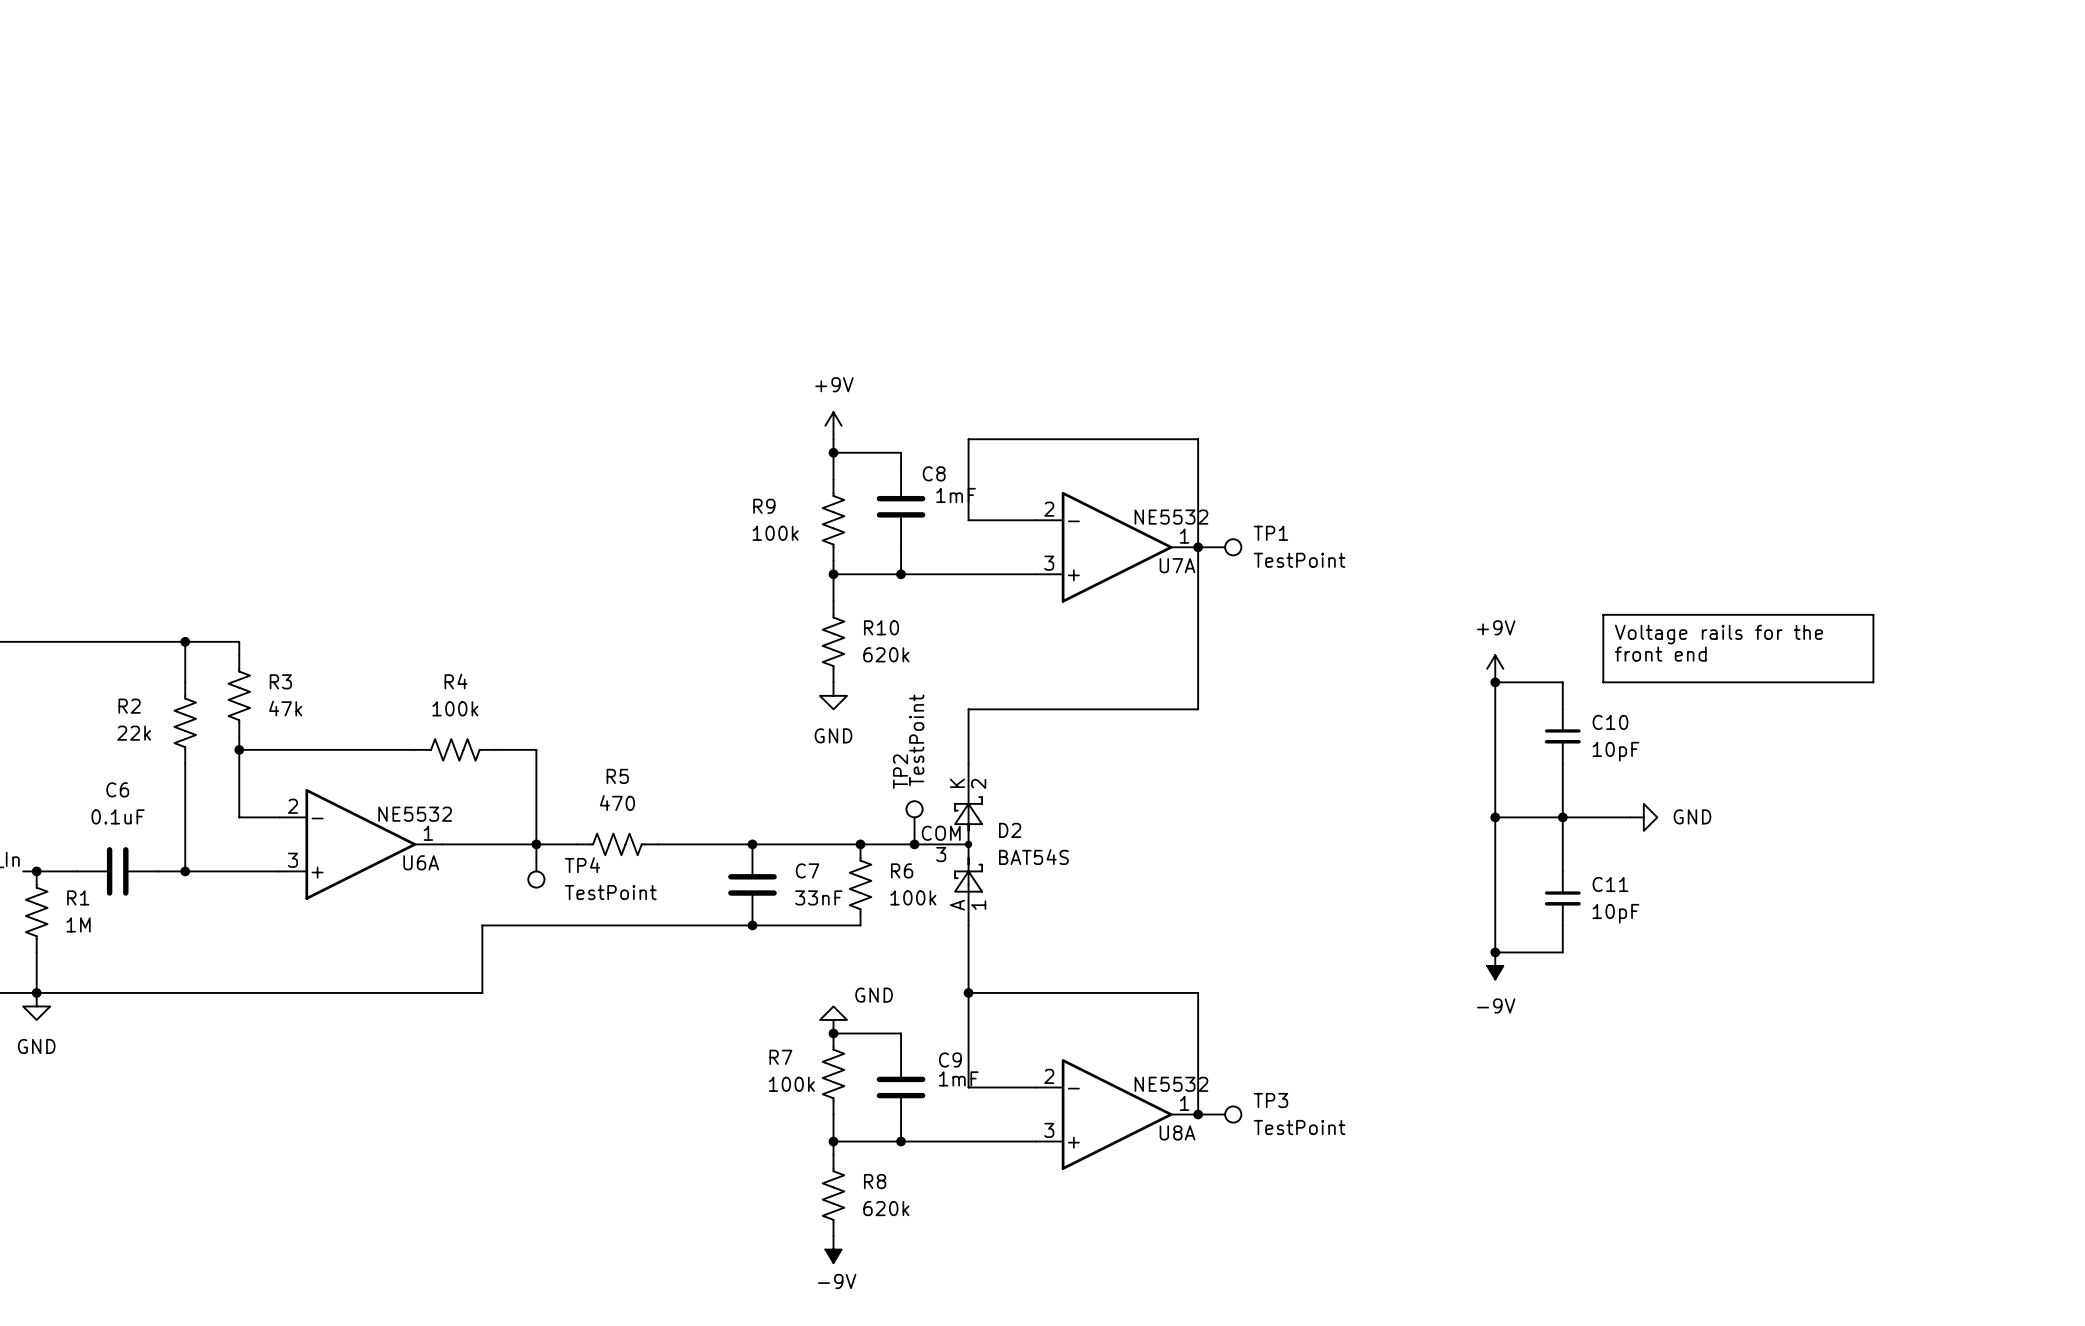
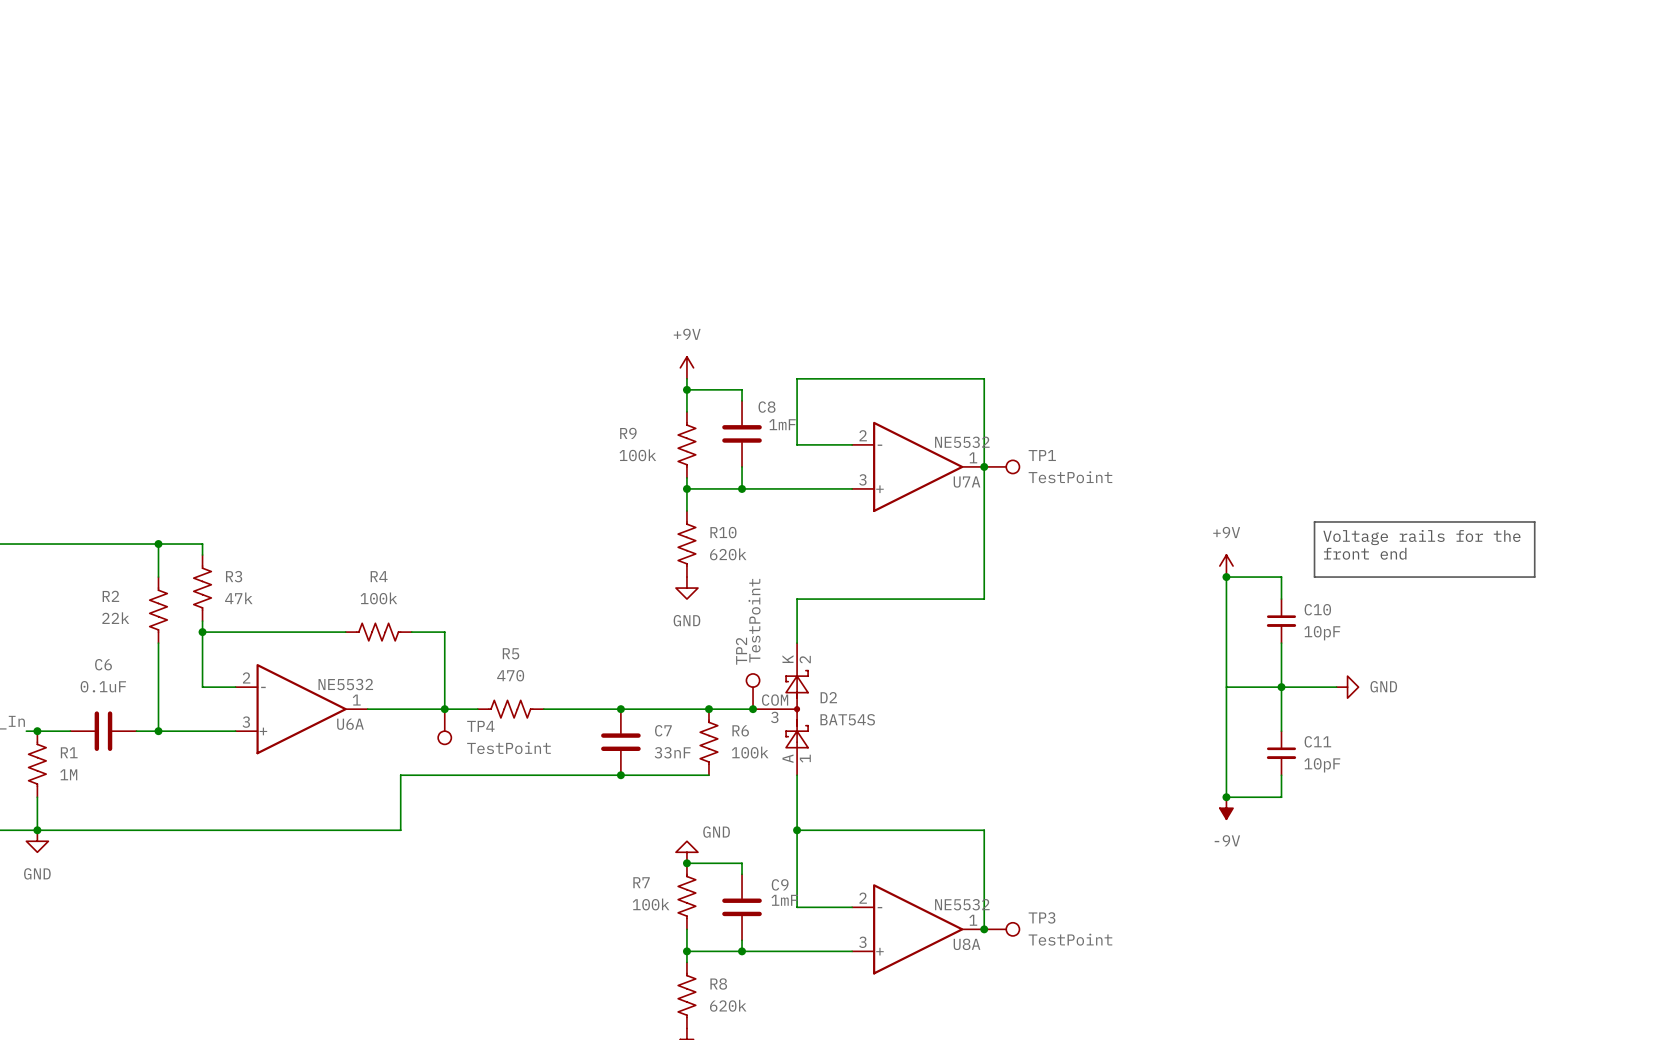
junction: (1495, 817) -> none

